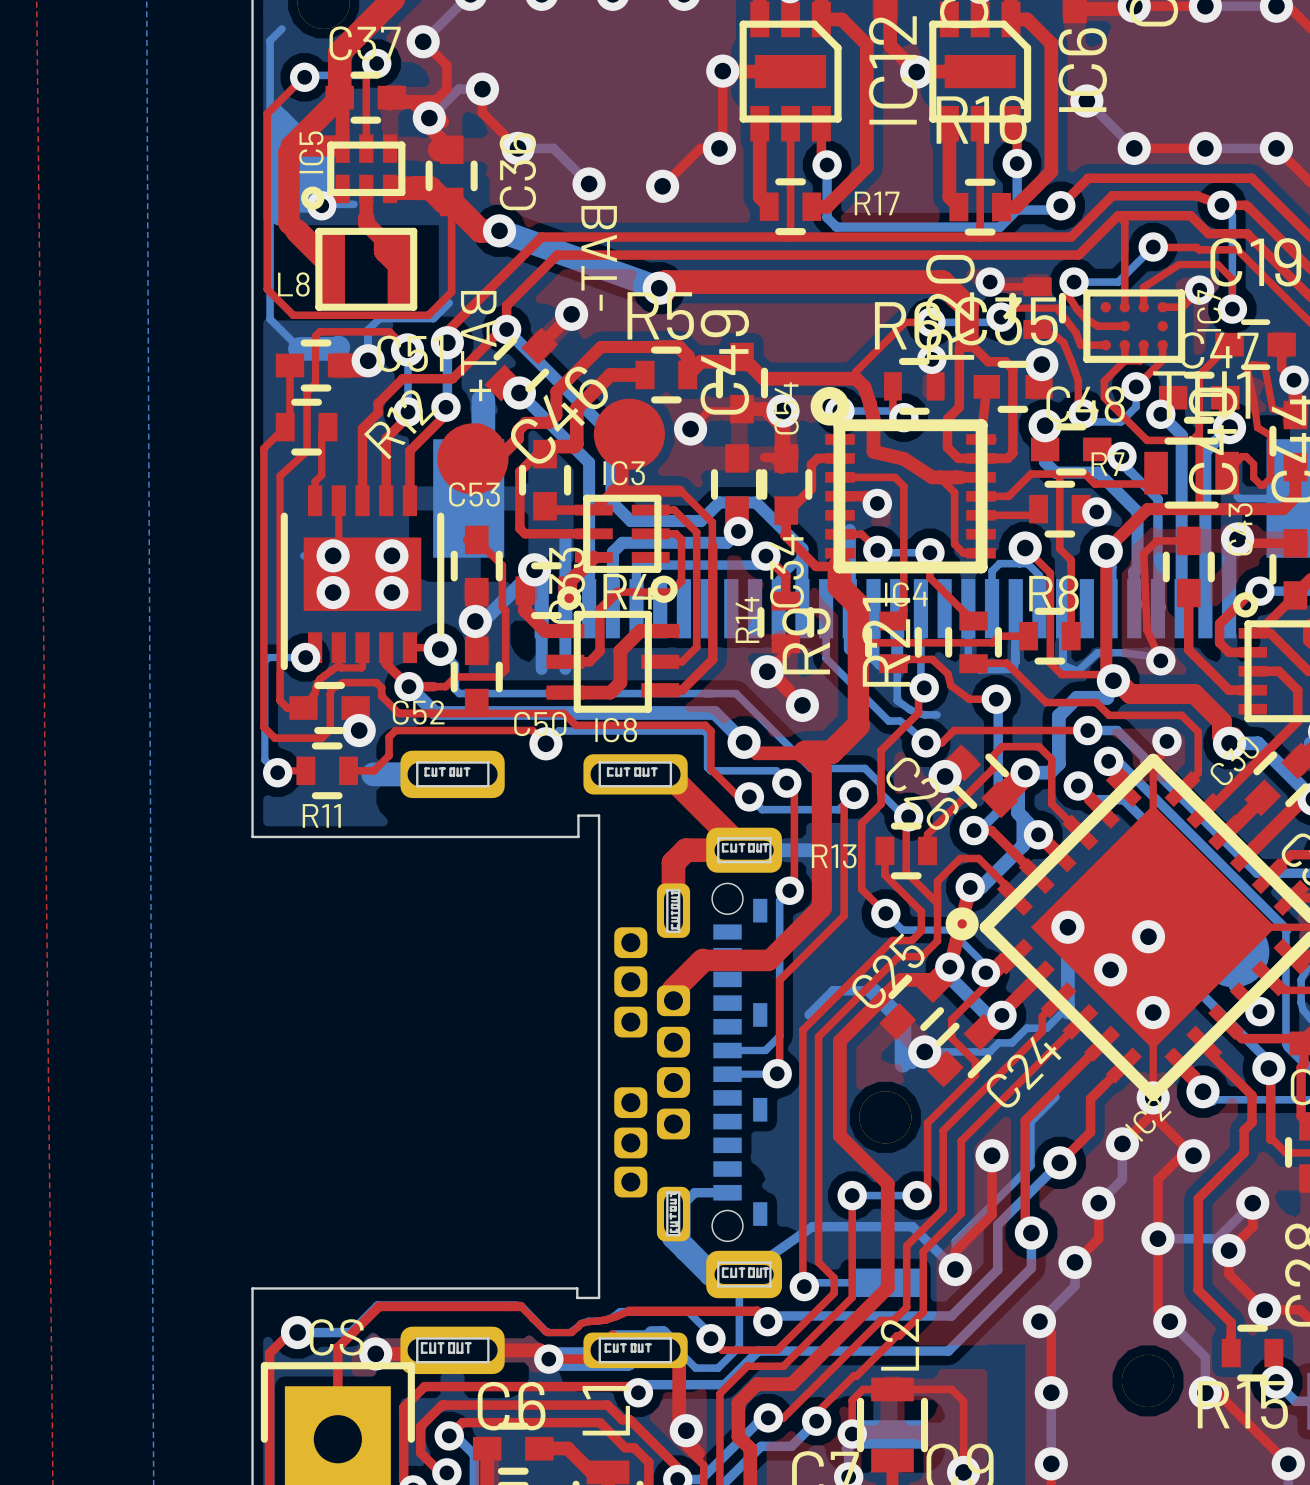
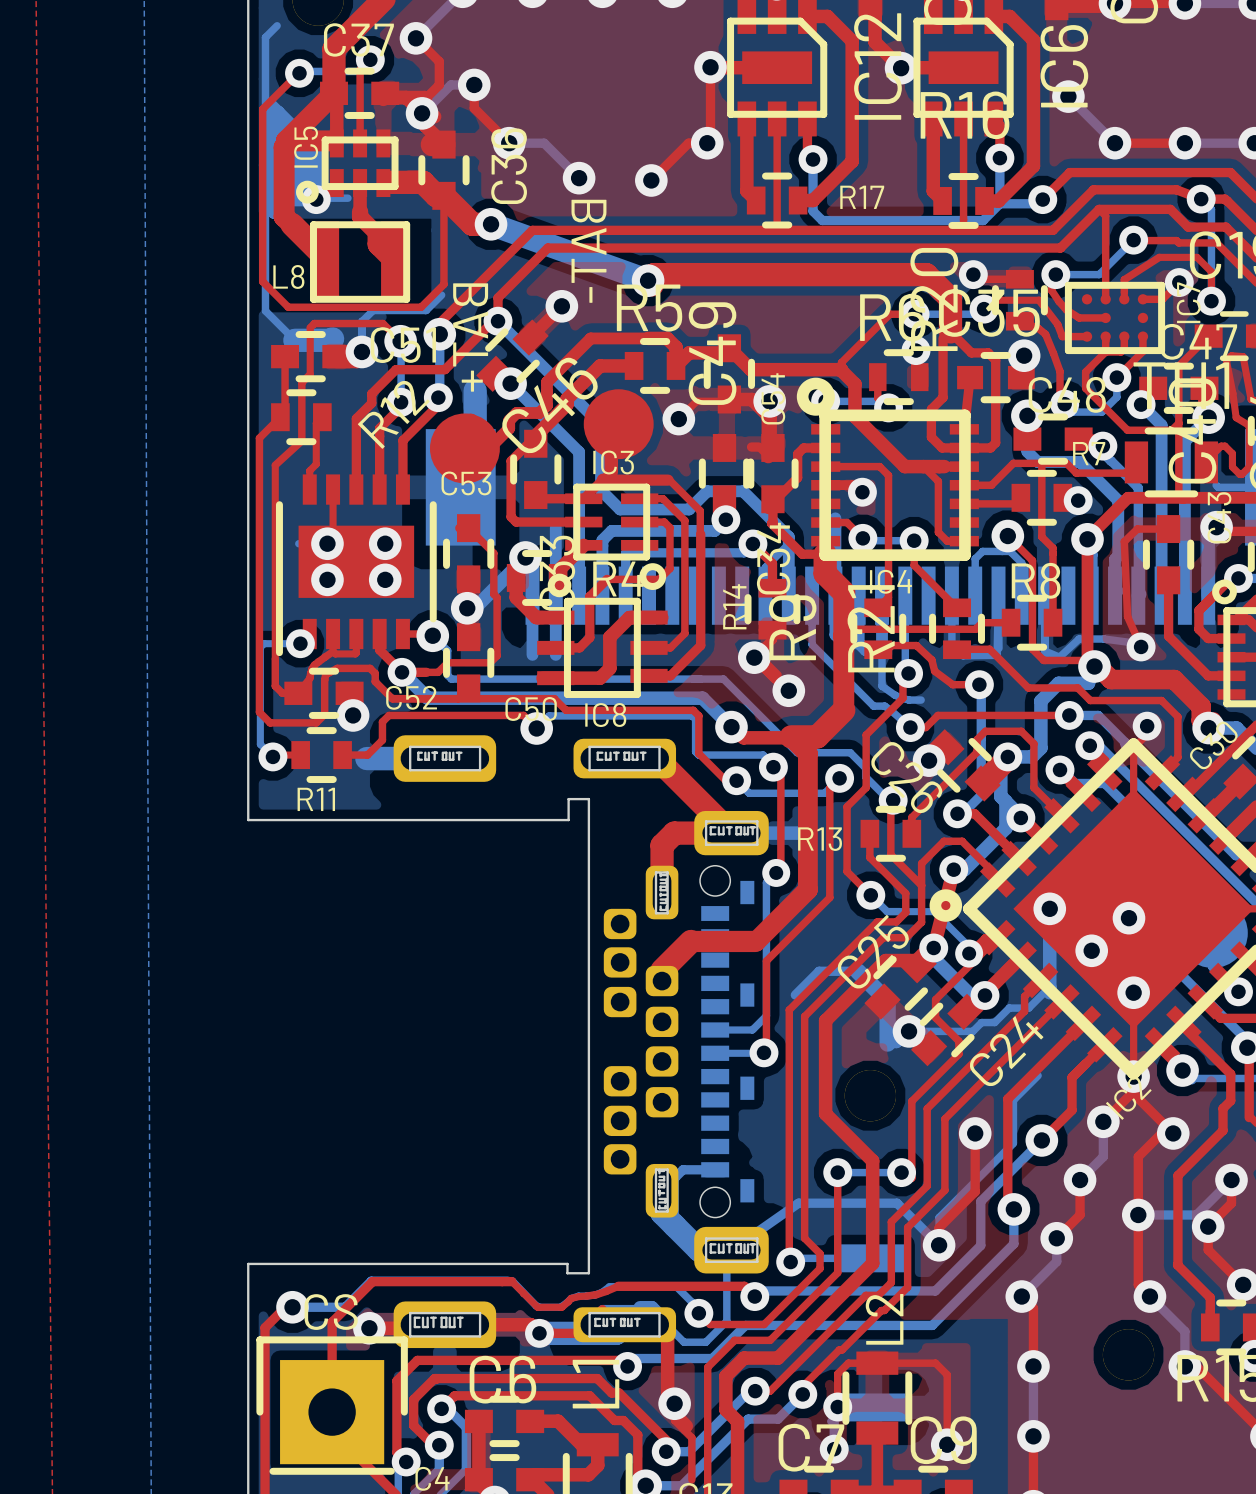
top track: (855, 378) (864, 387) (873, 418) (873, 451) (903, 458) (932, 477) -> (841, 370) (854, 384) (854, 416) (904, 466) (916, 466)
top track: (576, 414) (576, 444) (574, 446) (545, 446) -> (566, 404) (535, 435)

